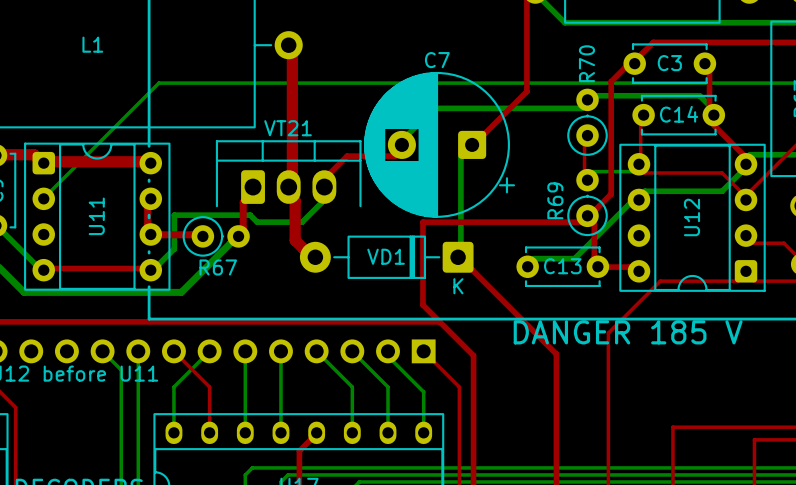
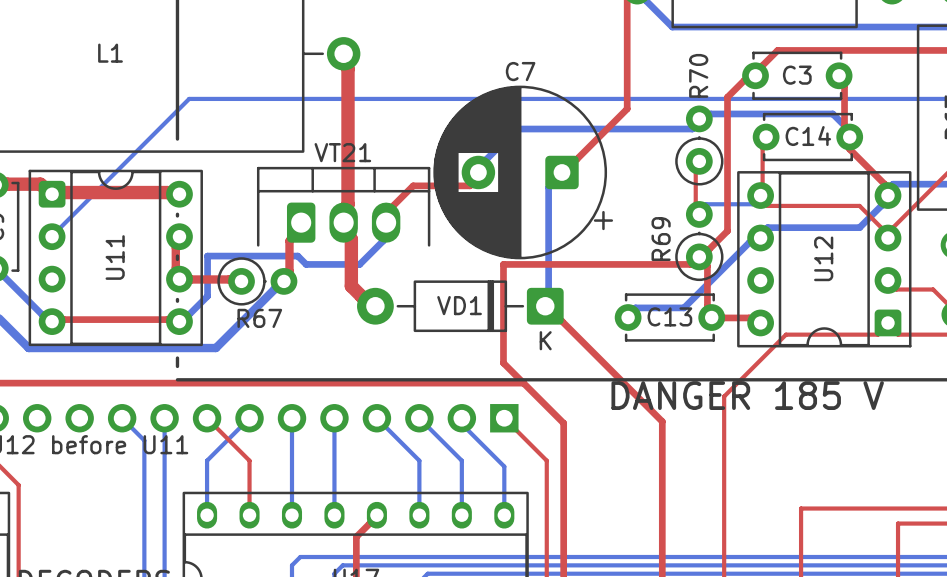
line: (149, 116) (149, 146) -> none
line: (149, 286) (149, 300) -> none
line: (149, 307) (149, 319) -> none

